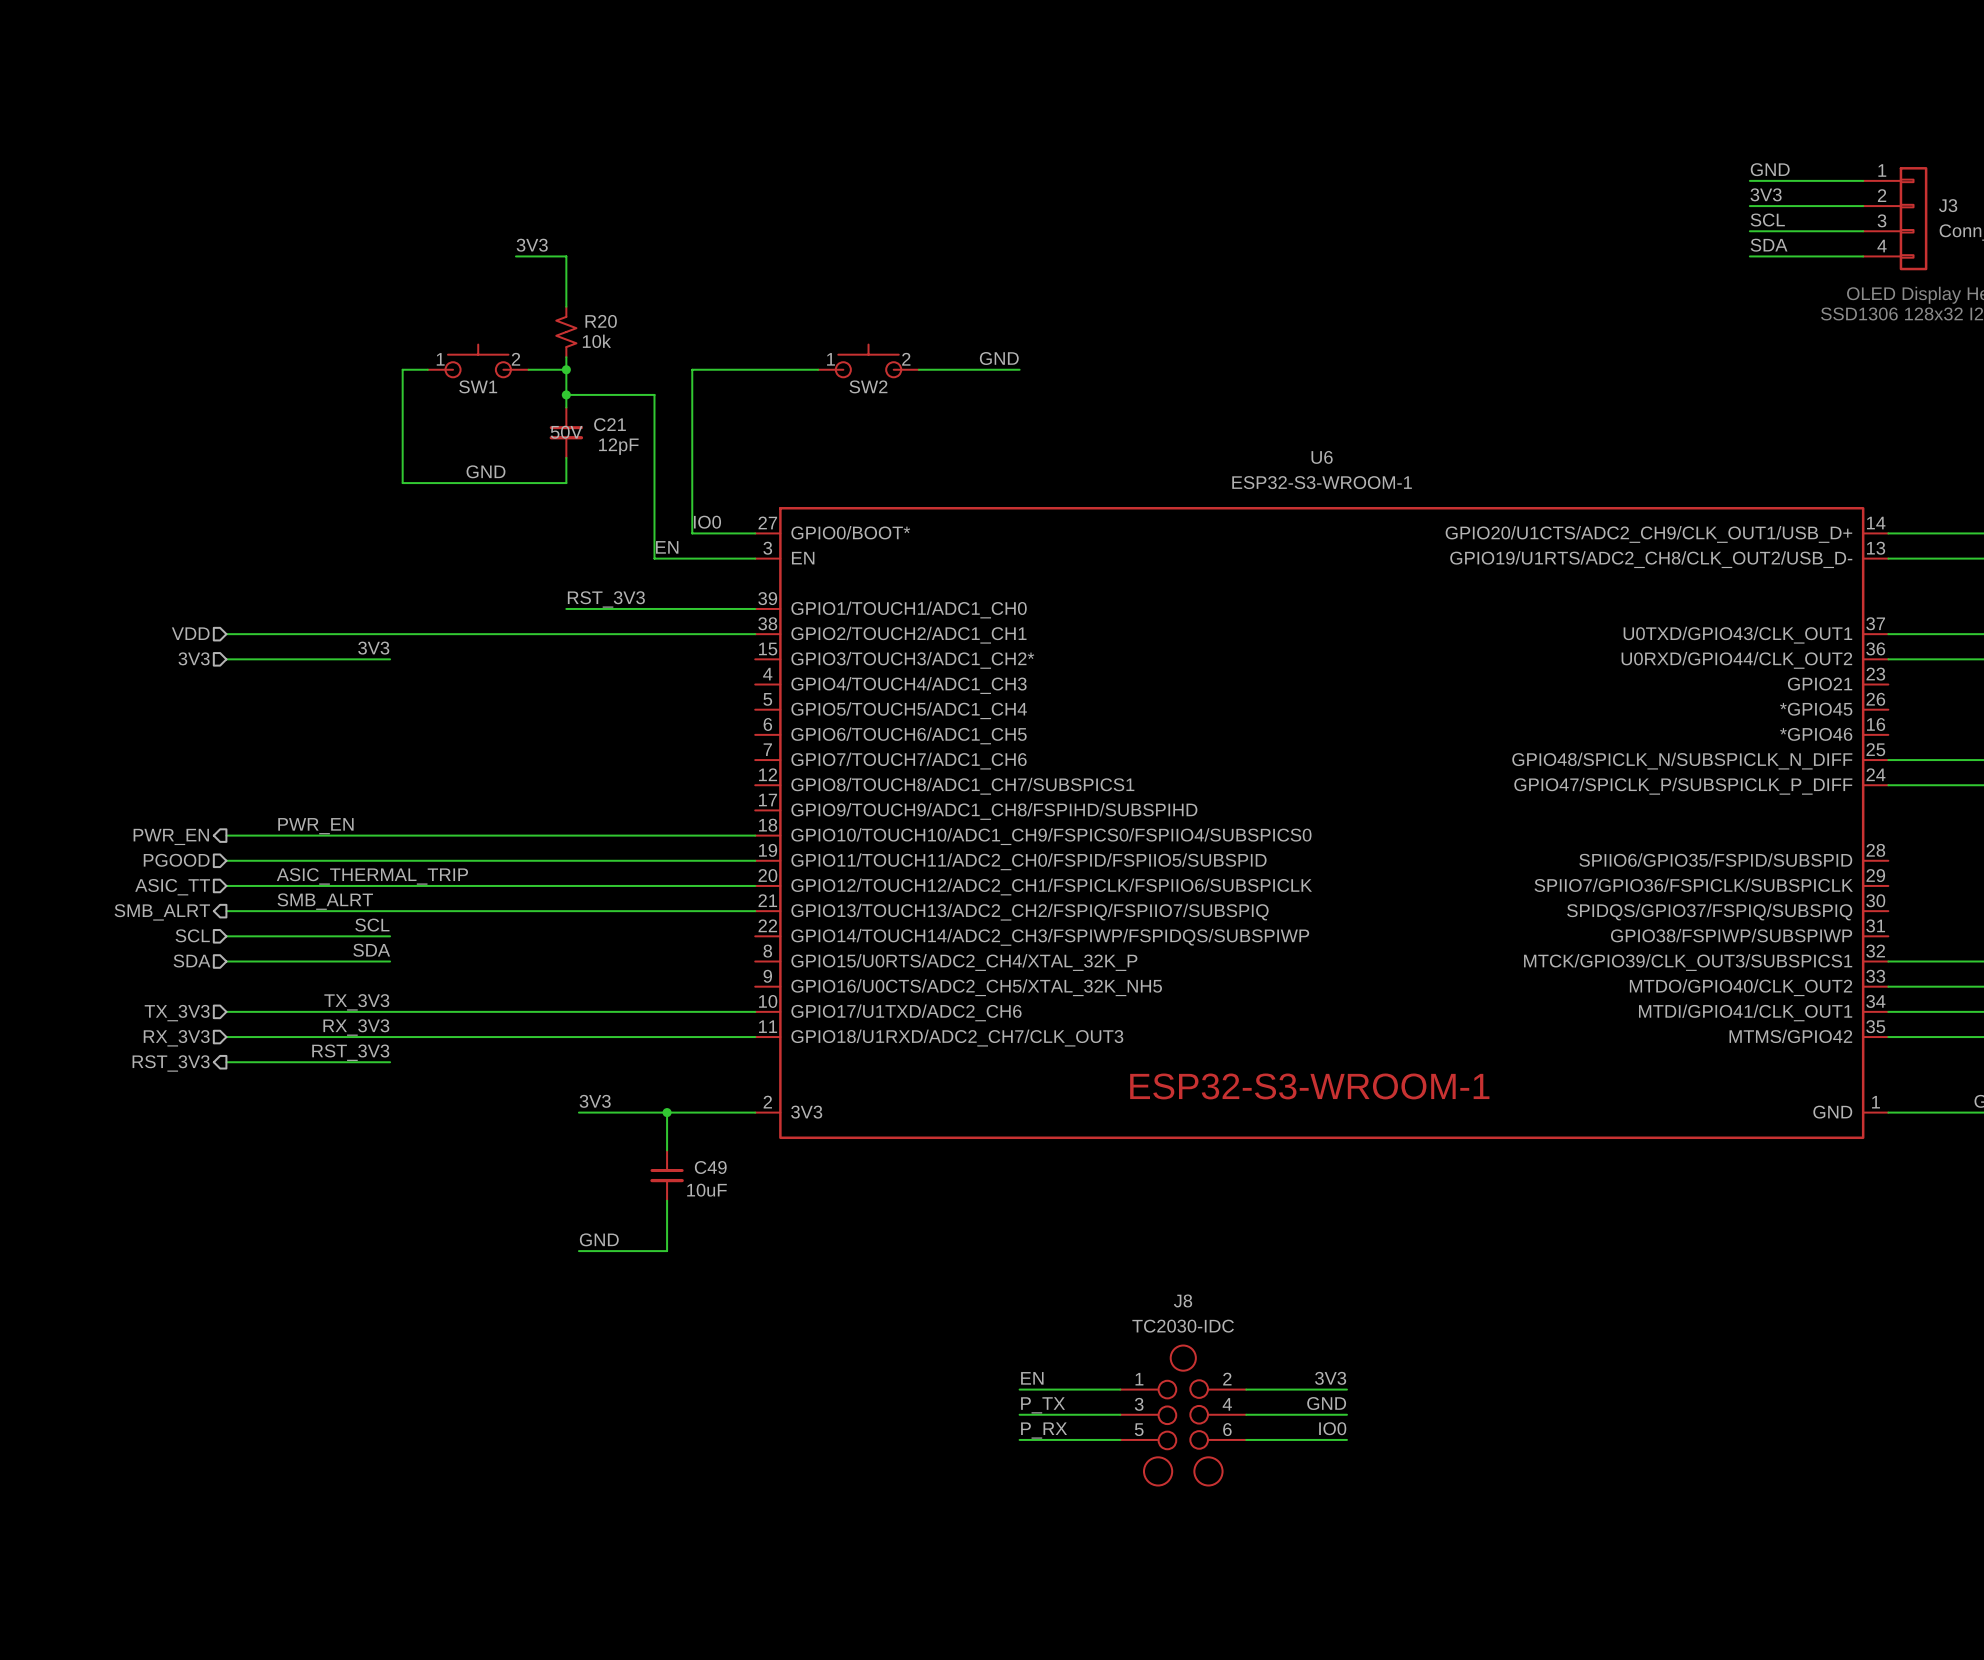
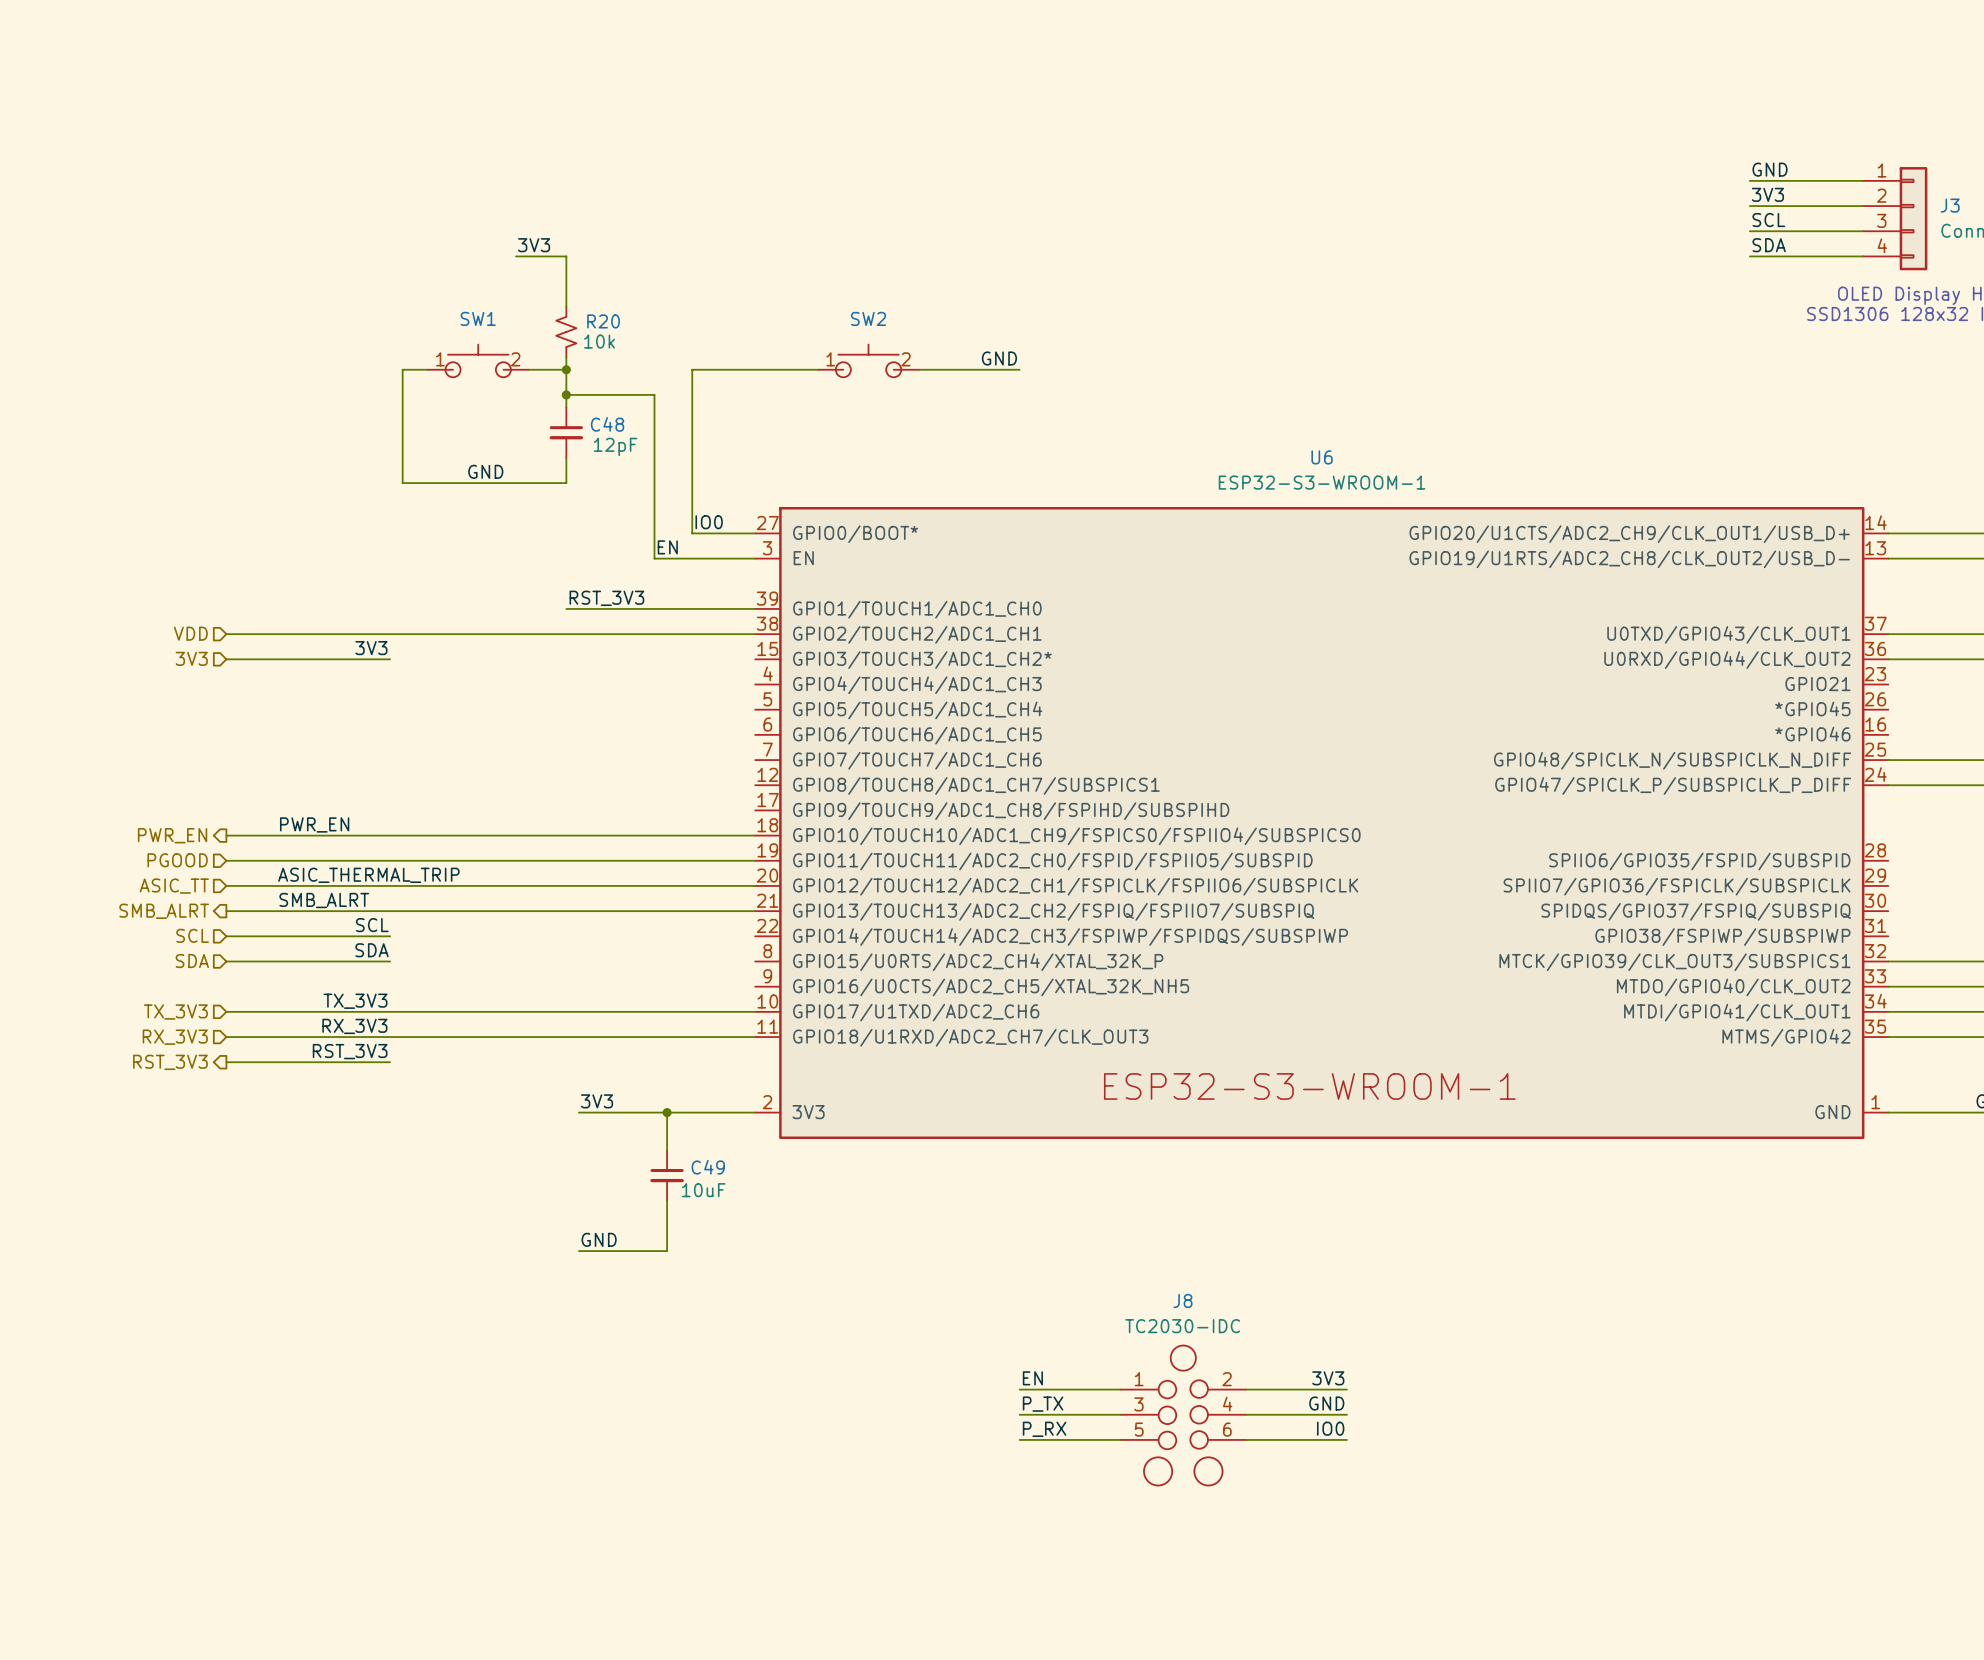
SW1 name position: SW1 (478, 386) -> SW1 (478, 318)
SW2 name position: SW2 (868, 386) -> SW2 (868, 318)
C21 name: C21 (610, 424) -> C48 (607, 424)
C21 text: 50V (566, 432) -> none

